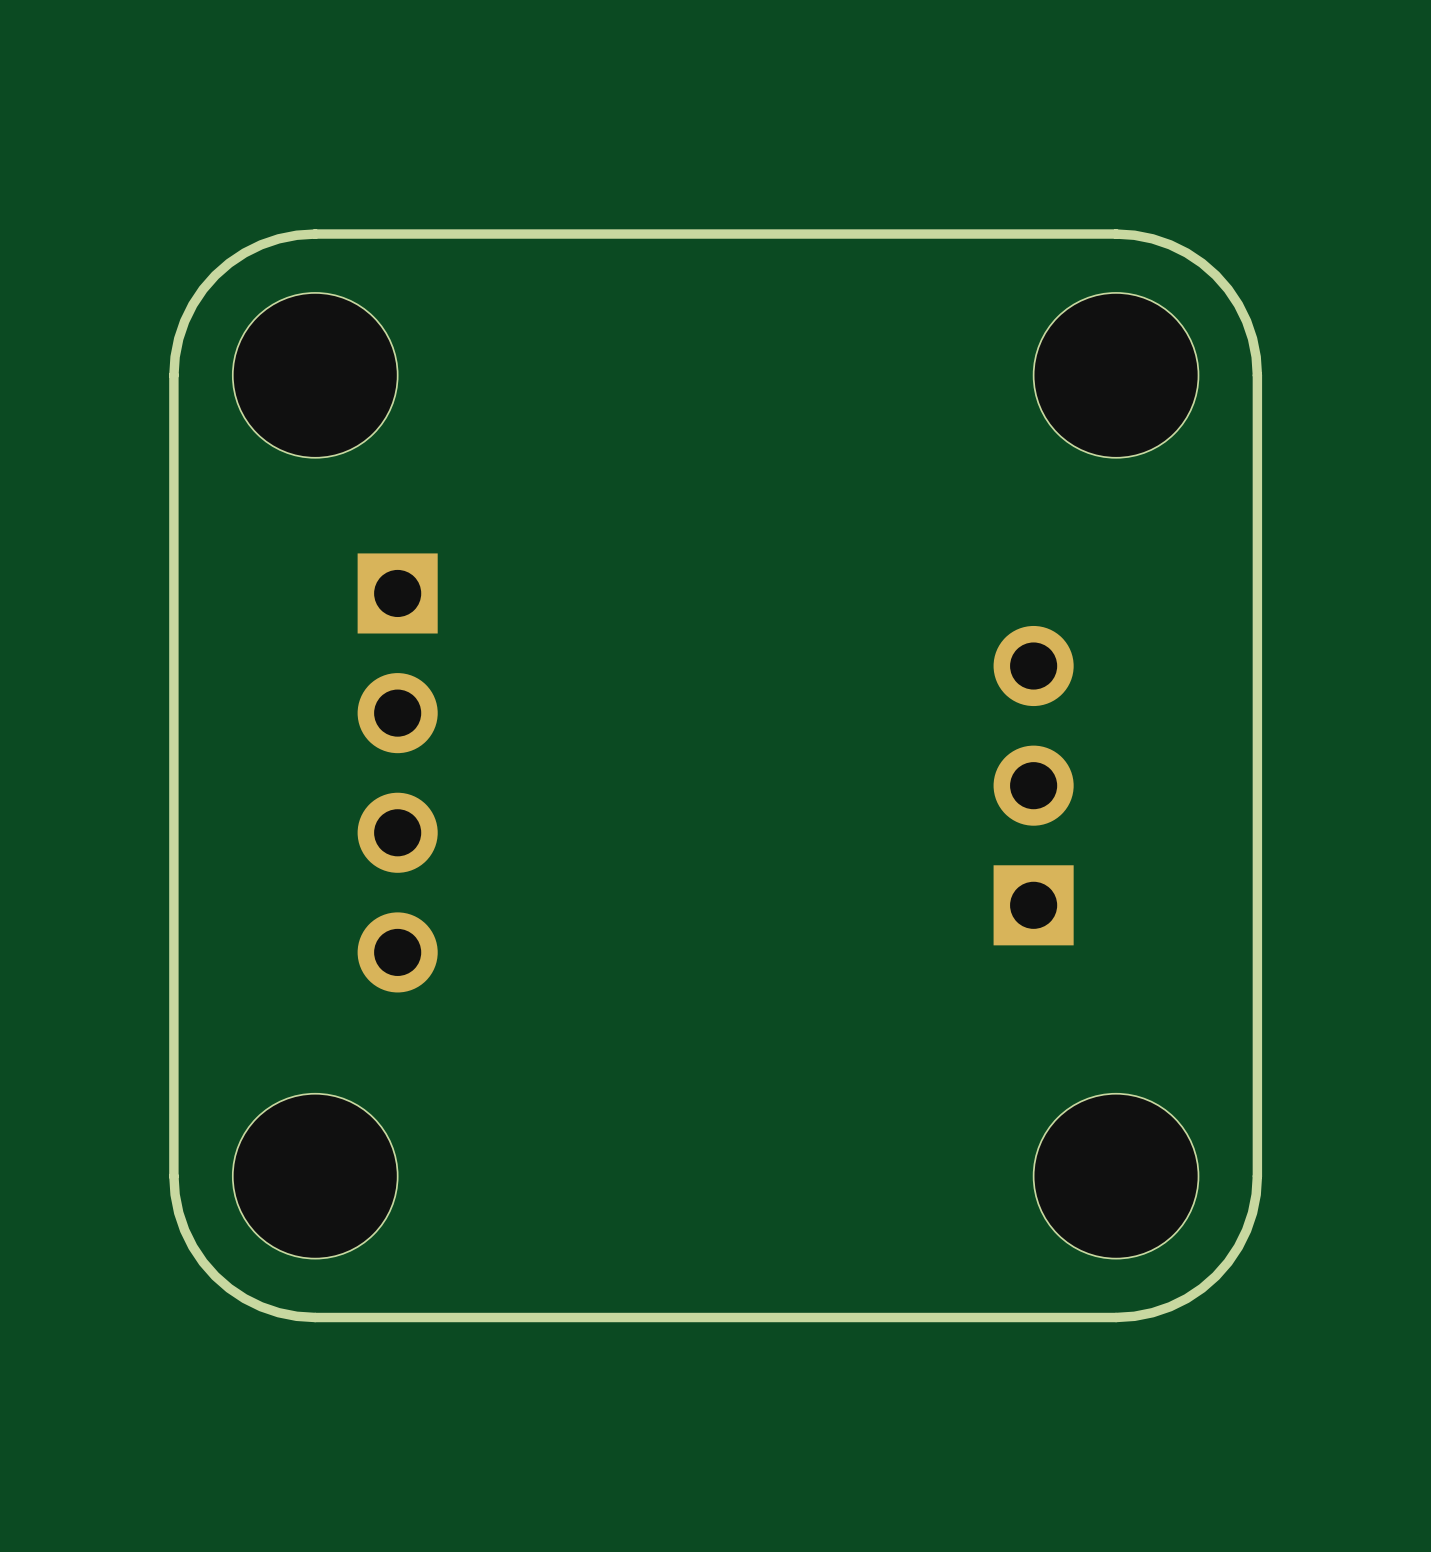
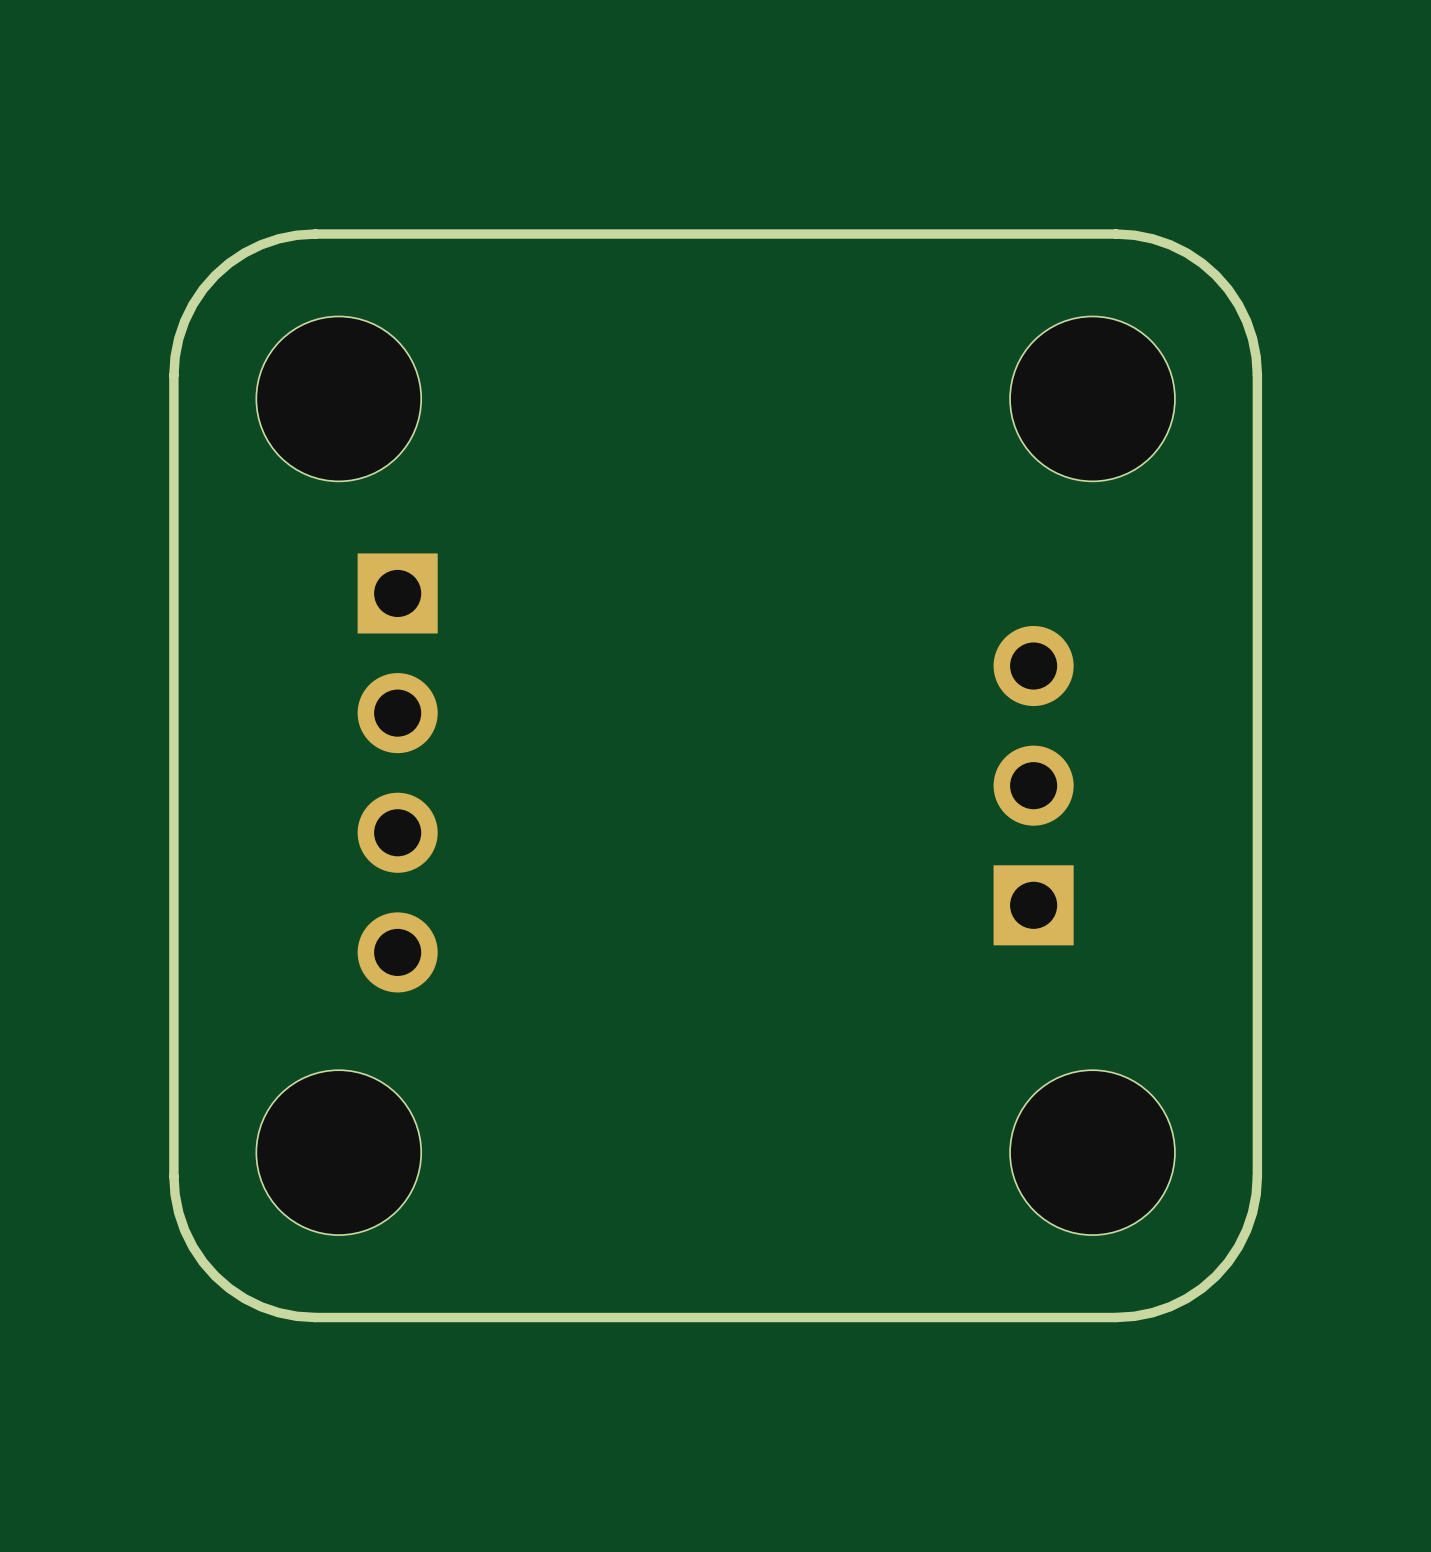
part position: (315, 375) -> (338, 398)
part position: (1116, 375) -> (1092, 398)
part position: (315, 1176) -> (338, 1152)
part position: (1116, 1176) -> (1092, 1152)

